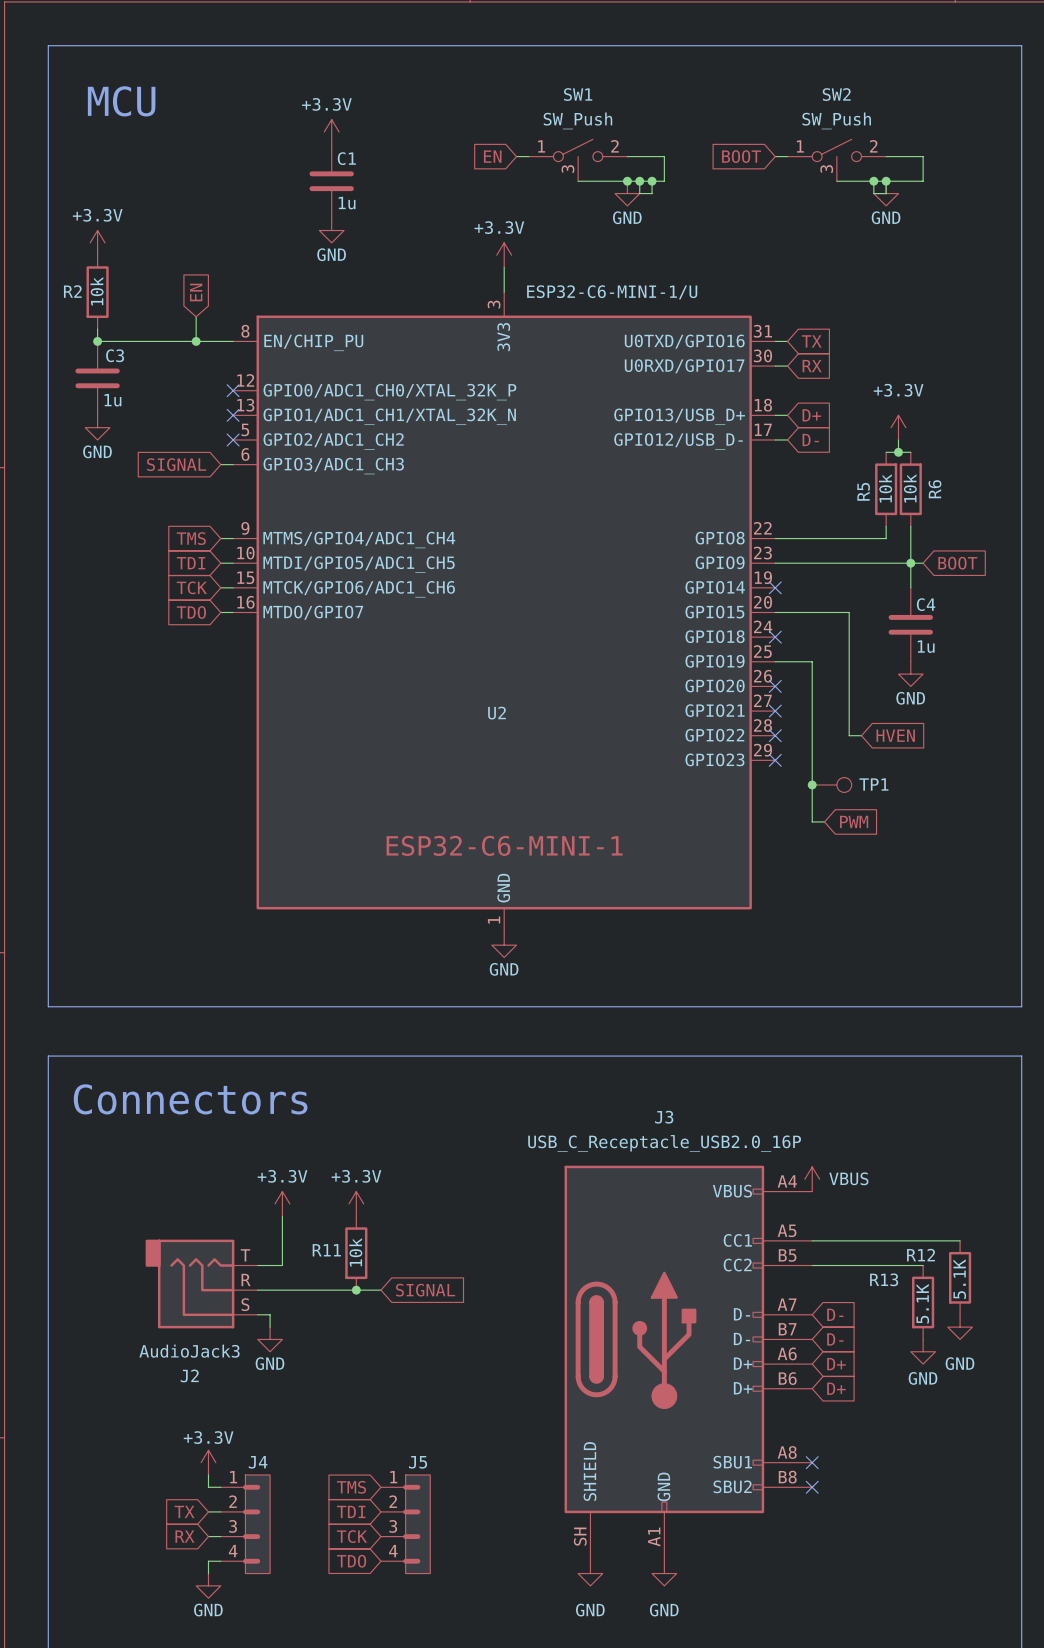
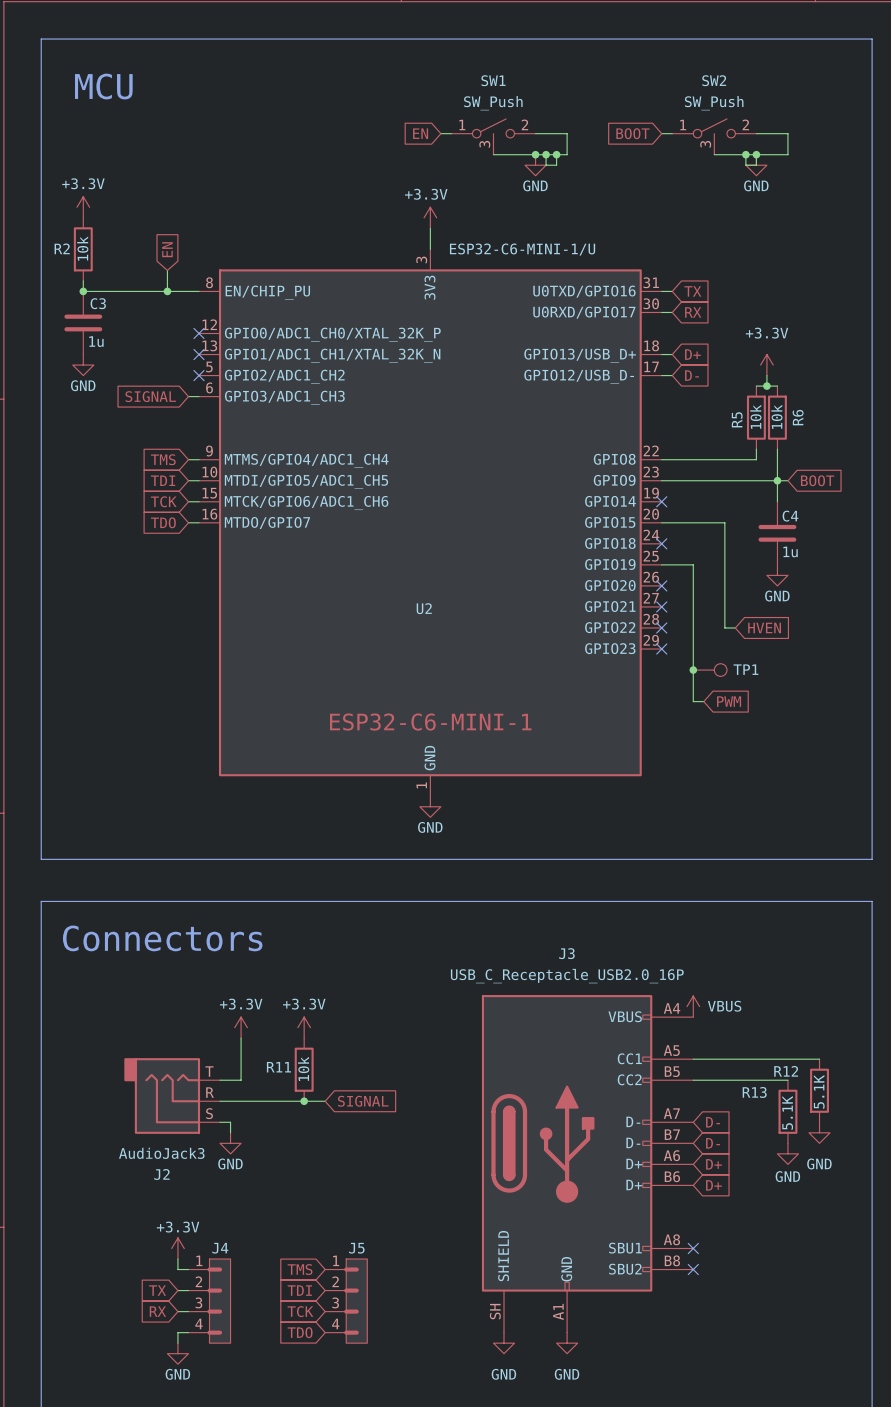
power symbol: +3.3V (331, 131) -> none
C1: 1u (331, 181) -> none
power symbol: GND (331, 230) -> none

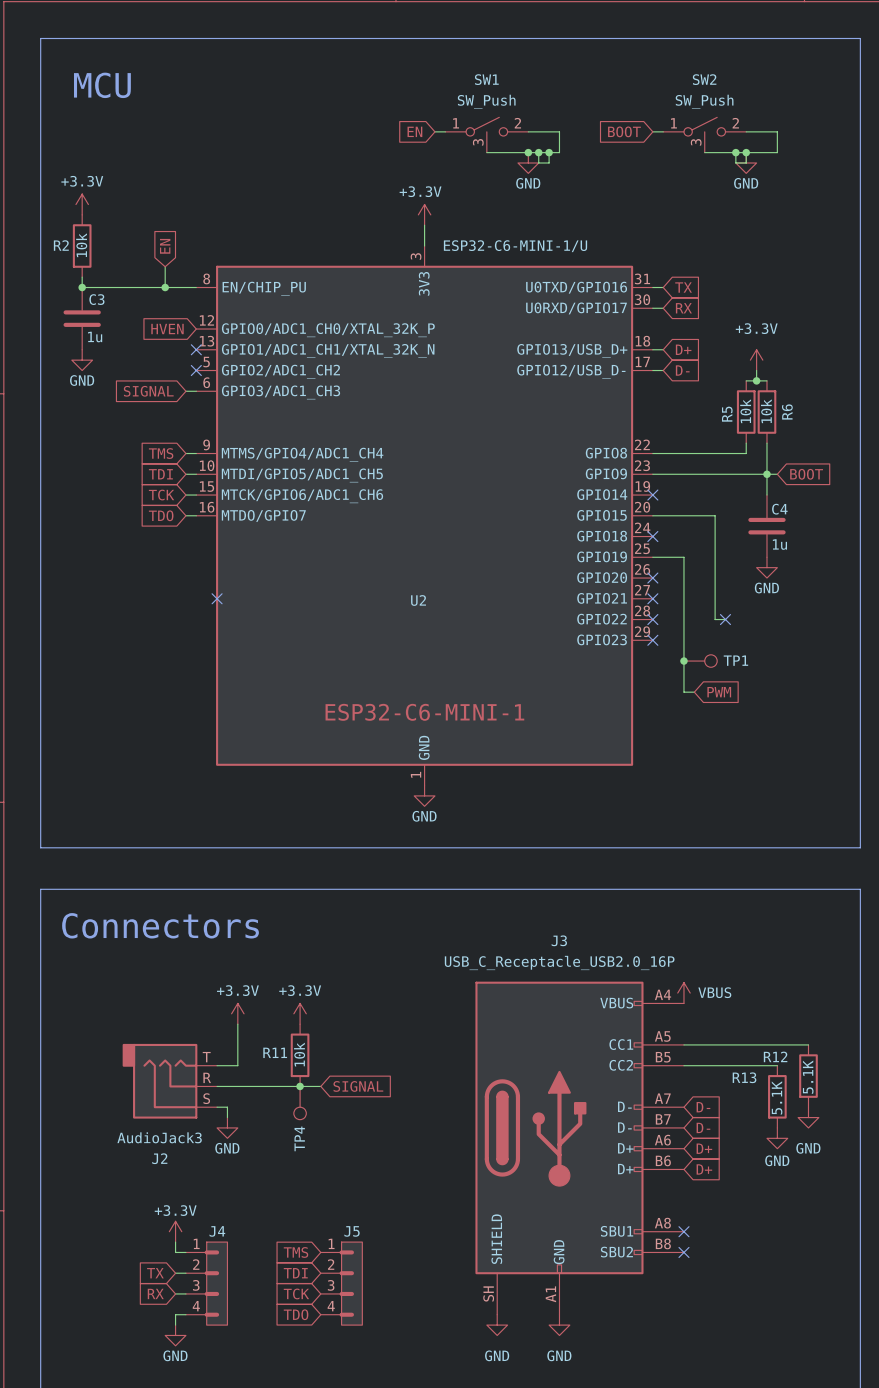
global label: none -> HVEN (167, 329)
no-connect mark: (198, 333) -> none
no-connect mark: none -> (217, 598)
no-connect mark: none -> (725, 619)
global label: HVEN (764, 627) -> none
TP4: none -> (300, 1103)

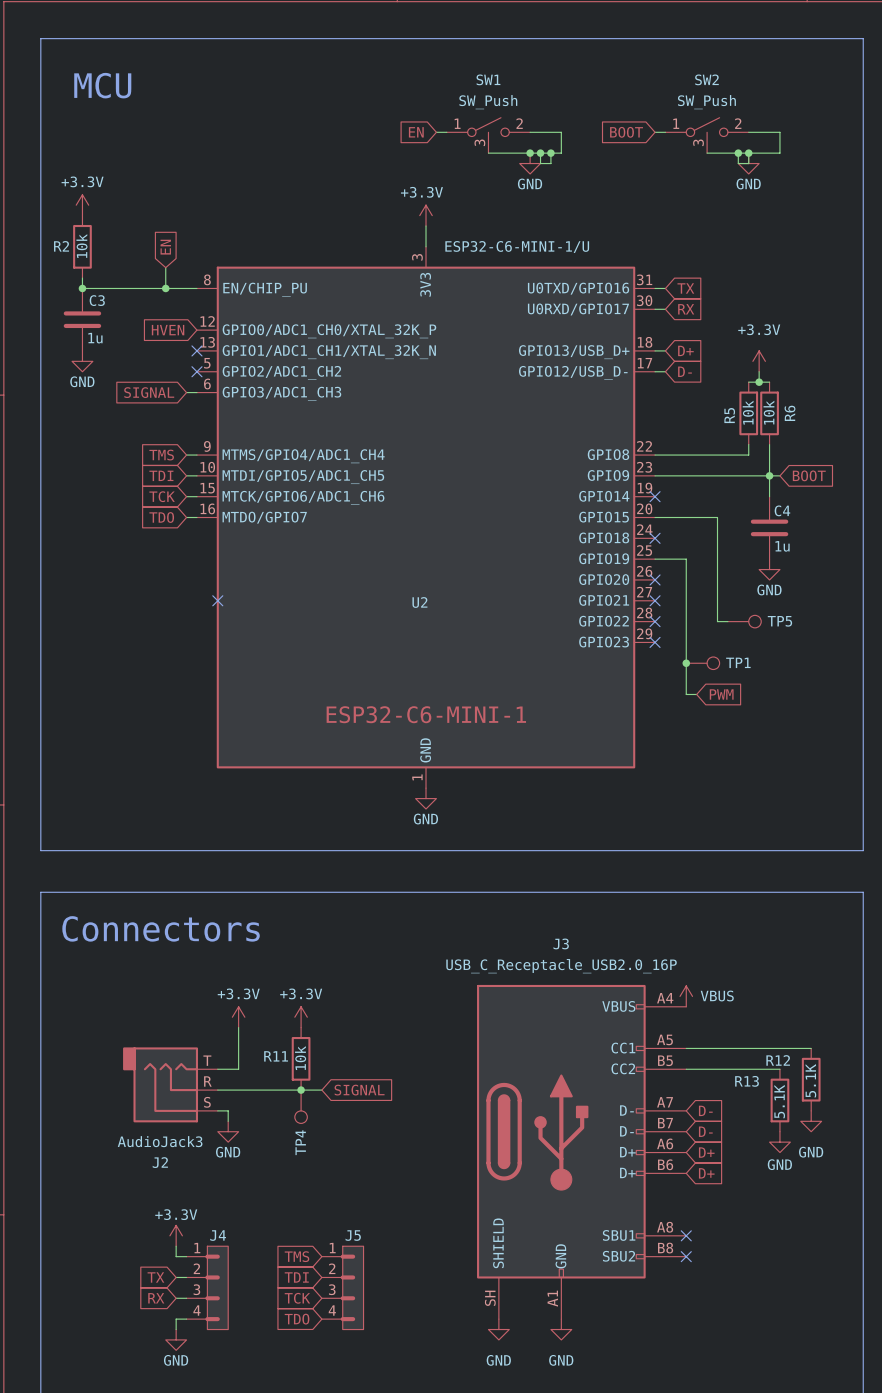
no-connect mark: (725, 619) -> none
TP5: none -> (744, 621)

